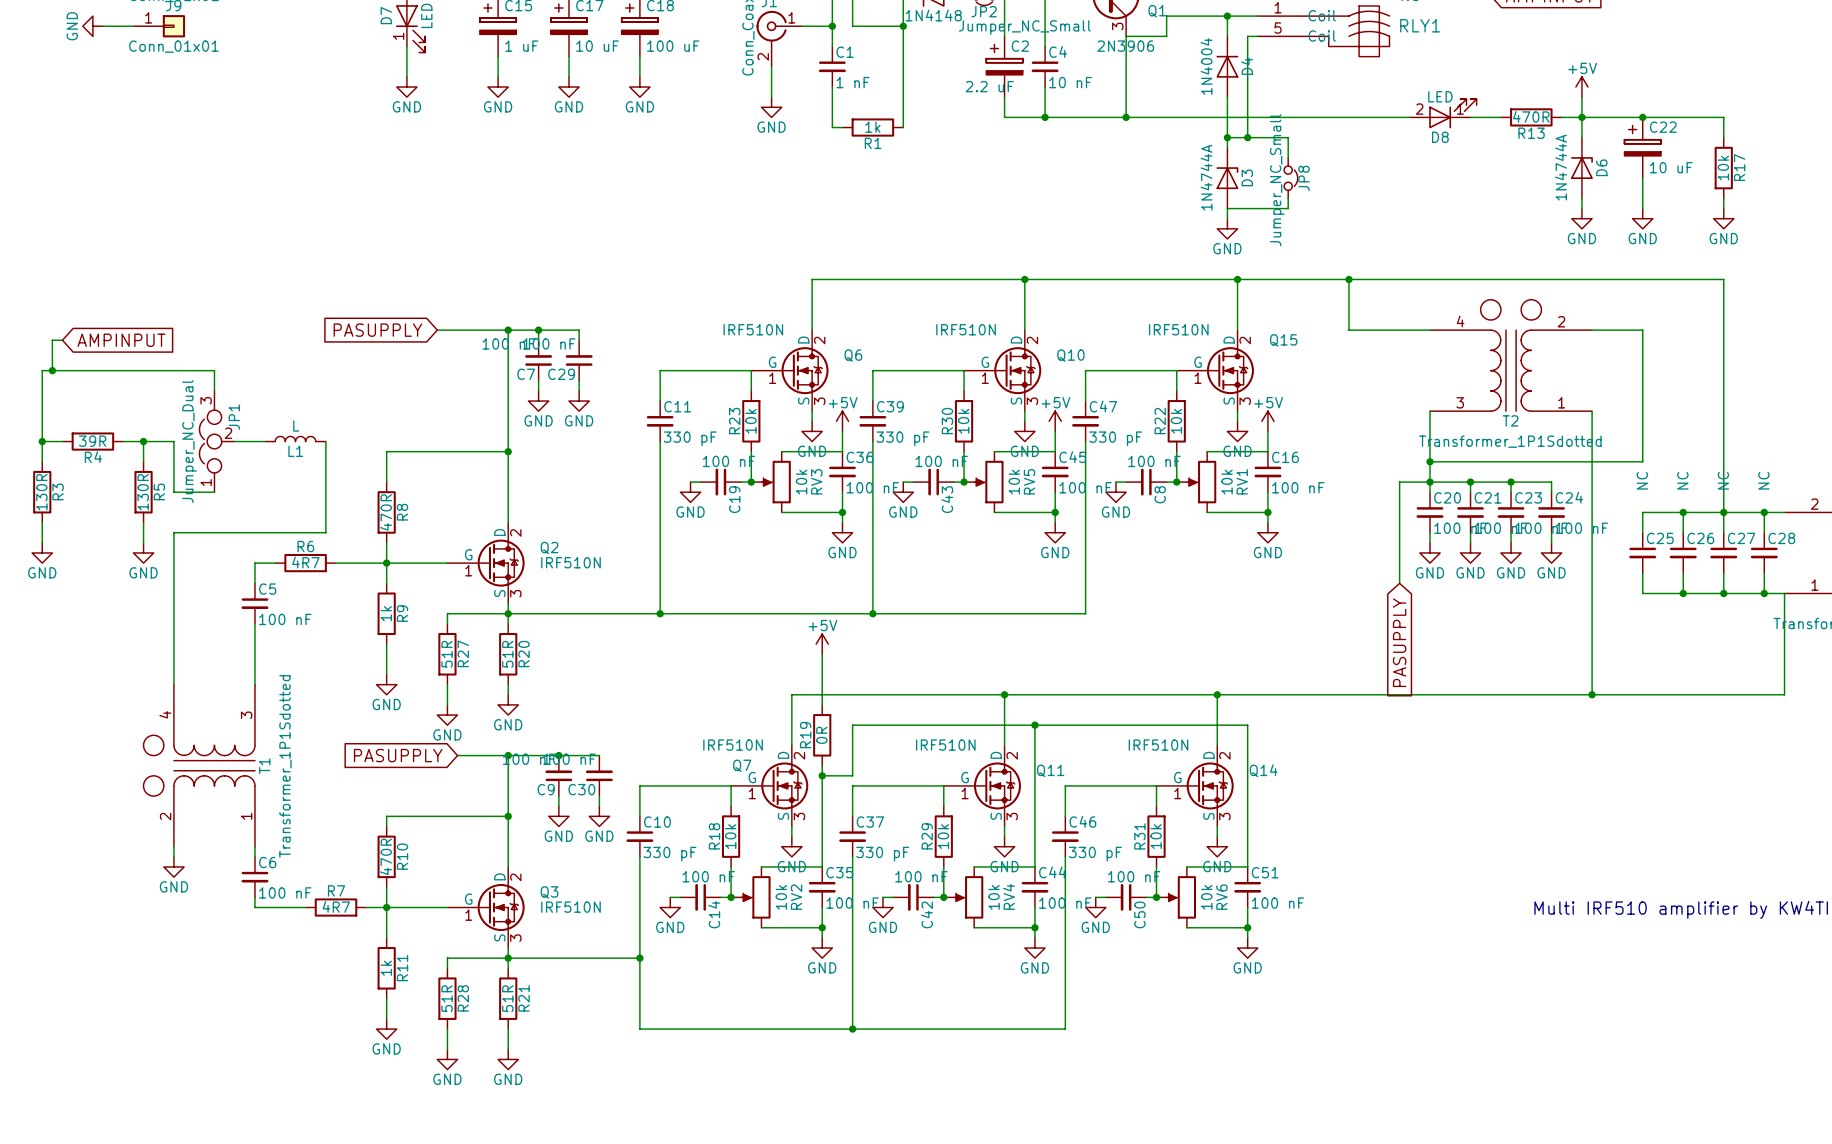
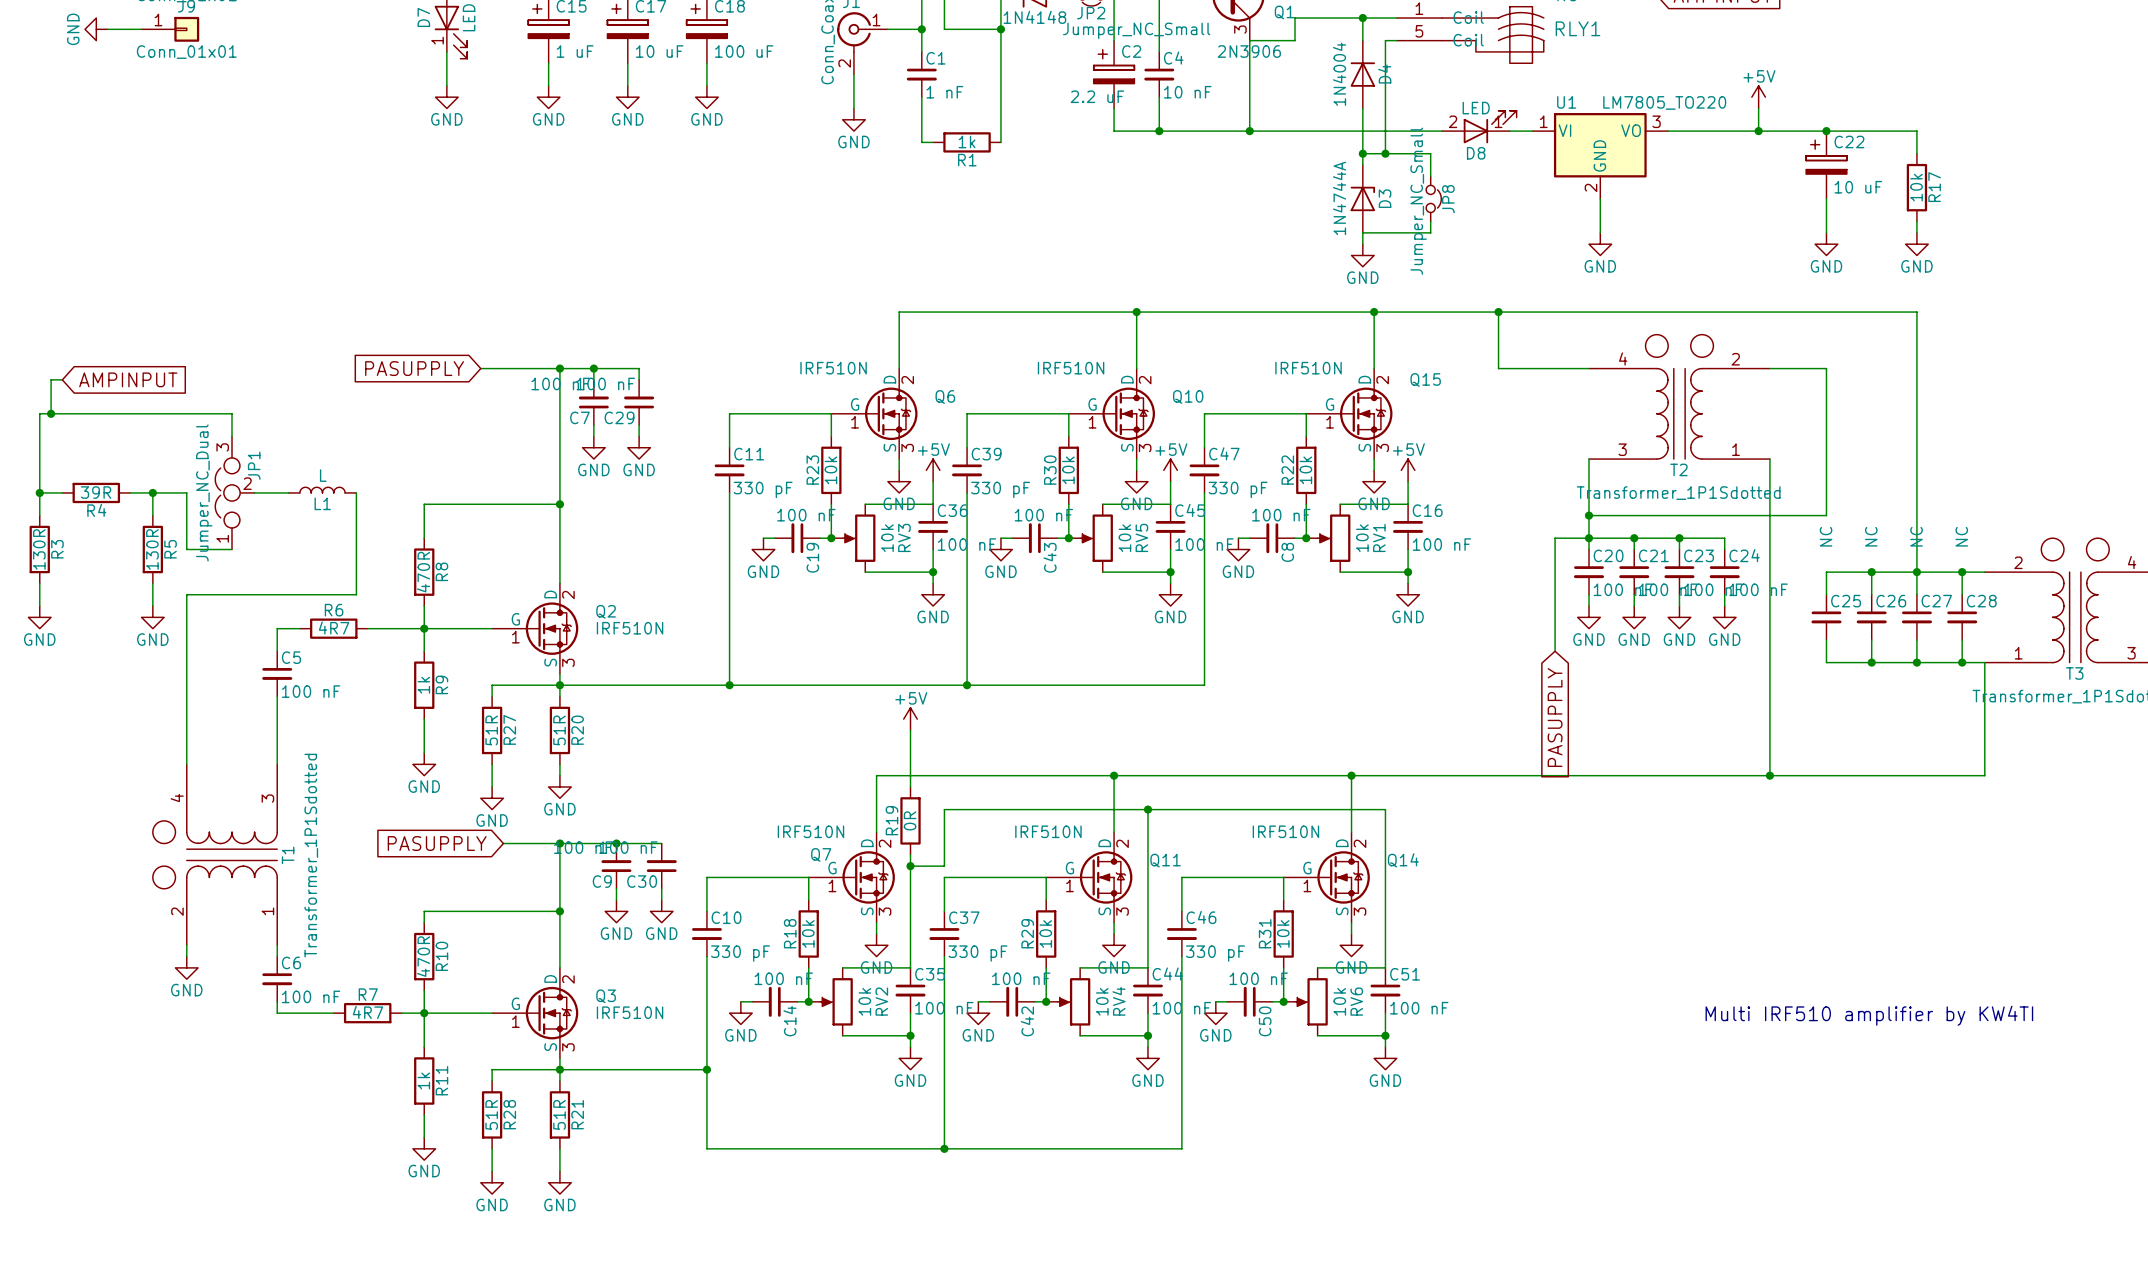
D8 position: (1443, 113) -> (1479, 127)
R13: 470R (1531, 117) -> none
wire: (1581, 117) (1581, 137) -> none
U1: none -> LM7805_TO220 (1600, 155)
D6: 1N4744A (1581, 168) -> none
wire: none -> (1600, 198) (1600, 232)
wire: (1581, 198) (1581, 208) -> none
power symbol position: GND (1581, 218) -> GND (1600, 244)

